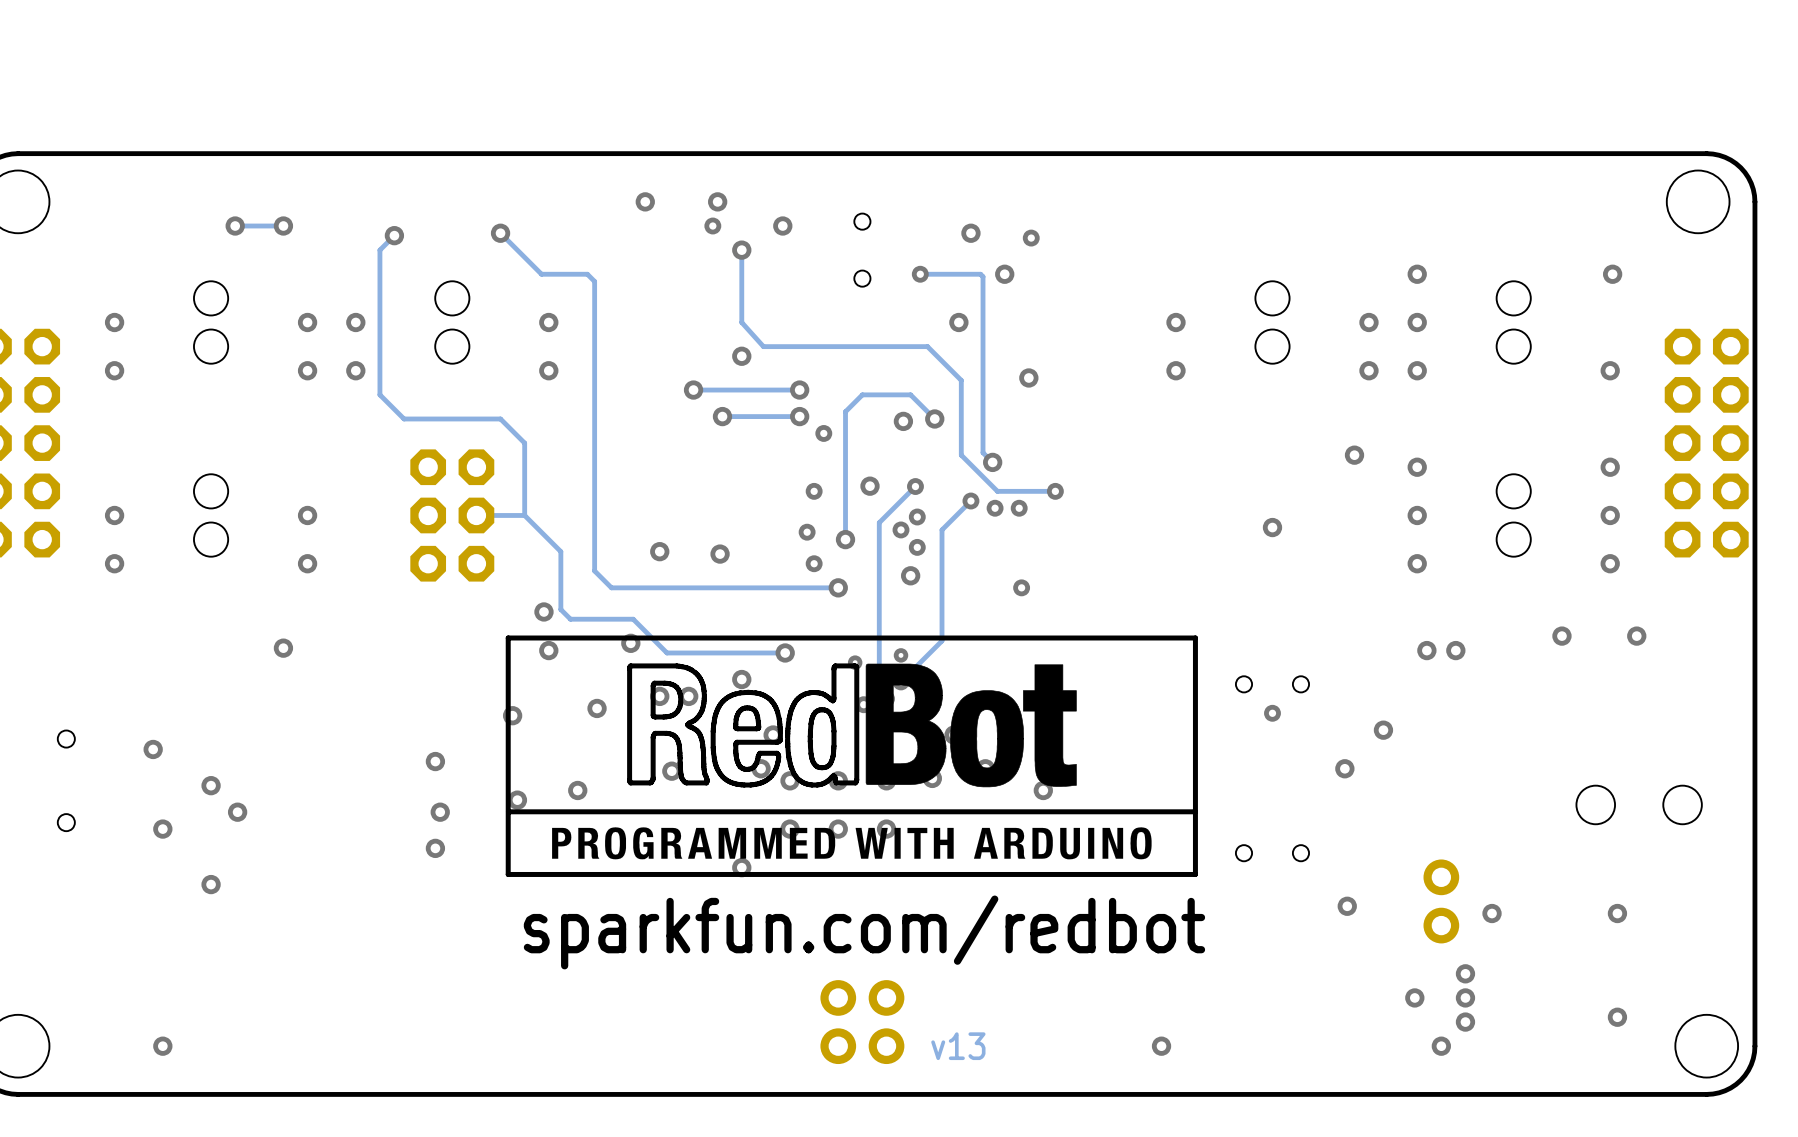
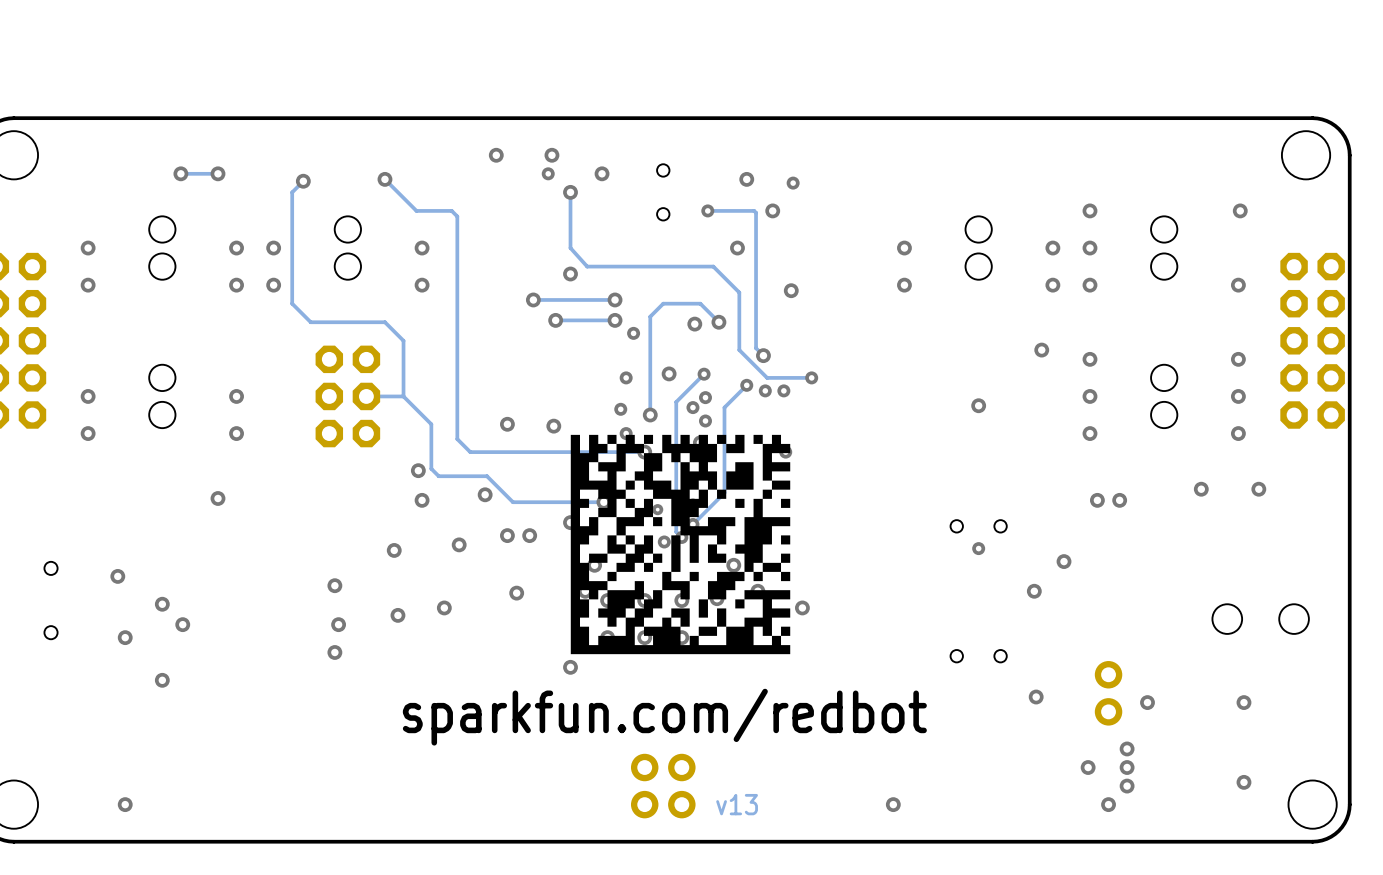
drawing: none -> [570, 434, 791, 655]
drawing: [505, 635, 1198, 877] -> none

